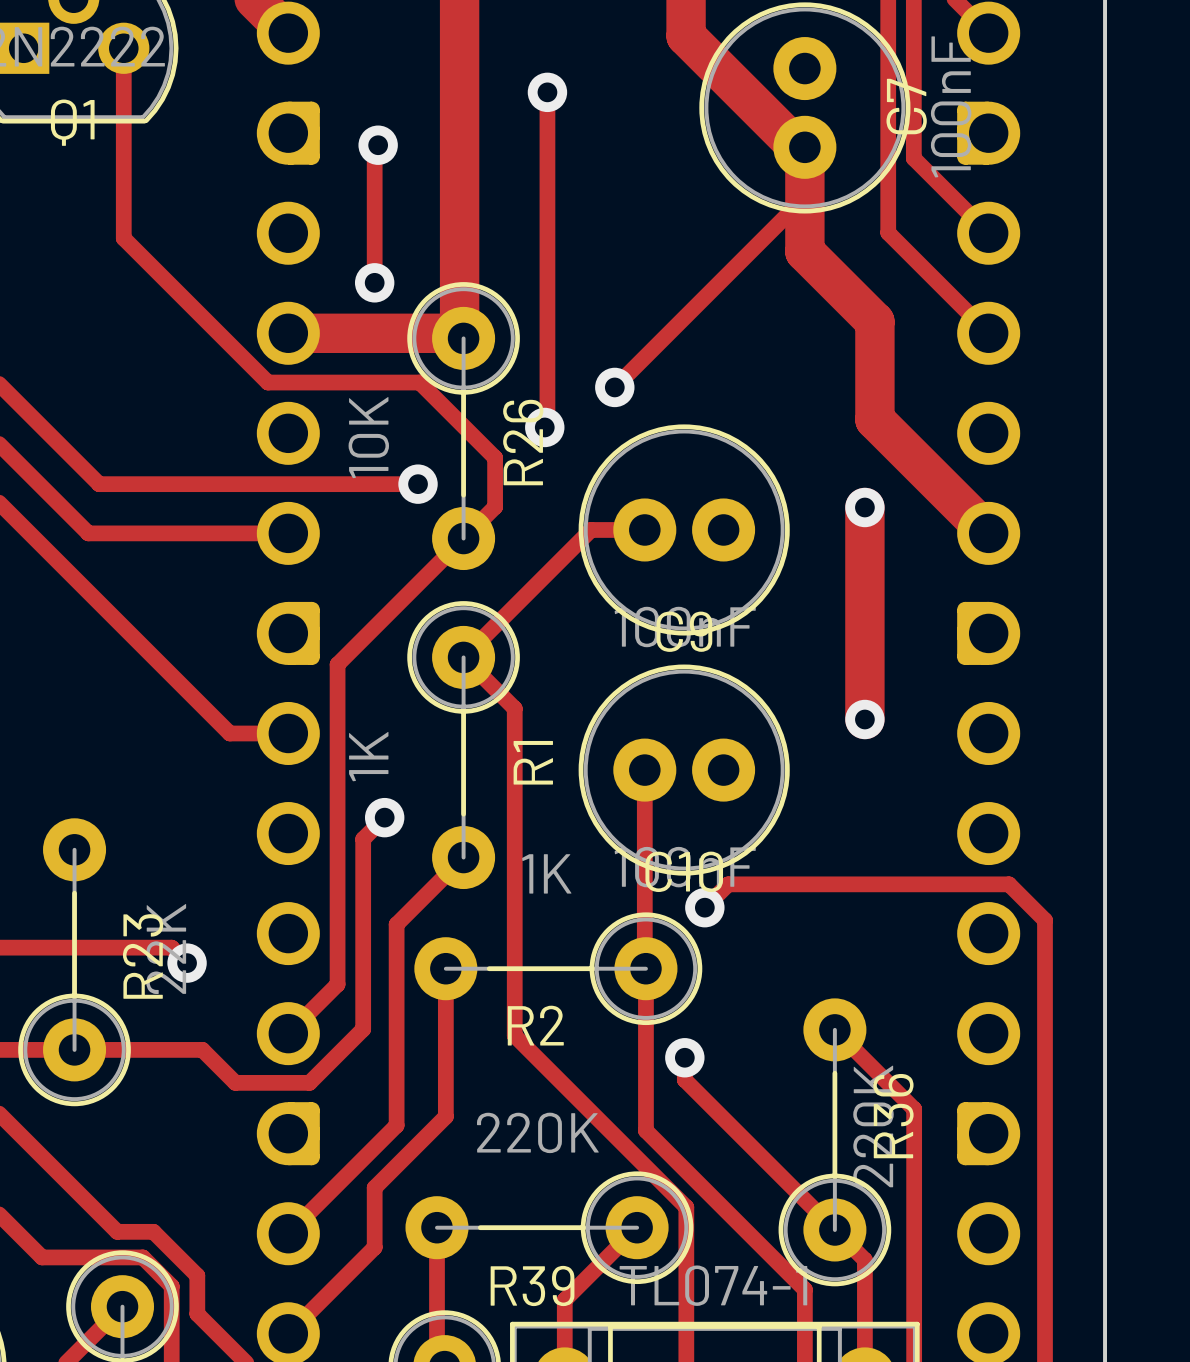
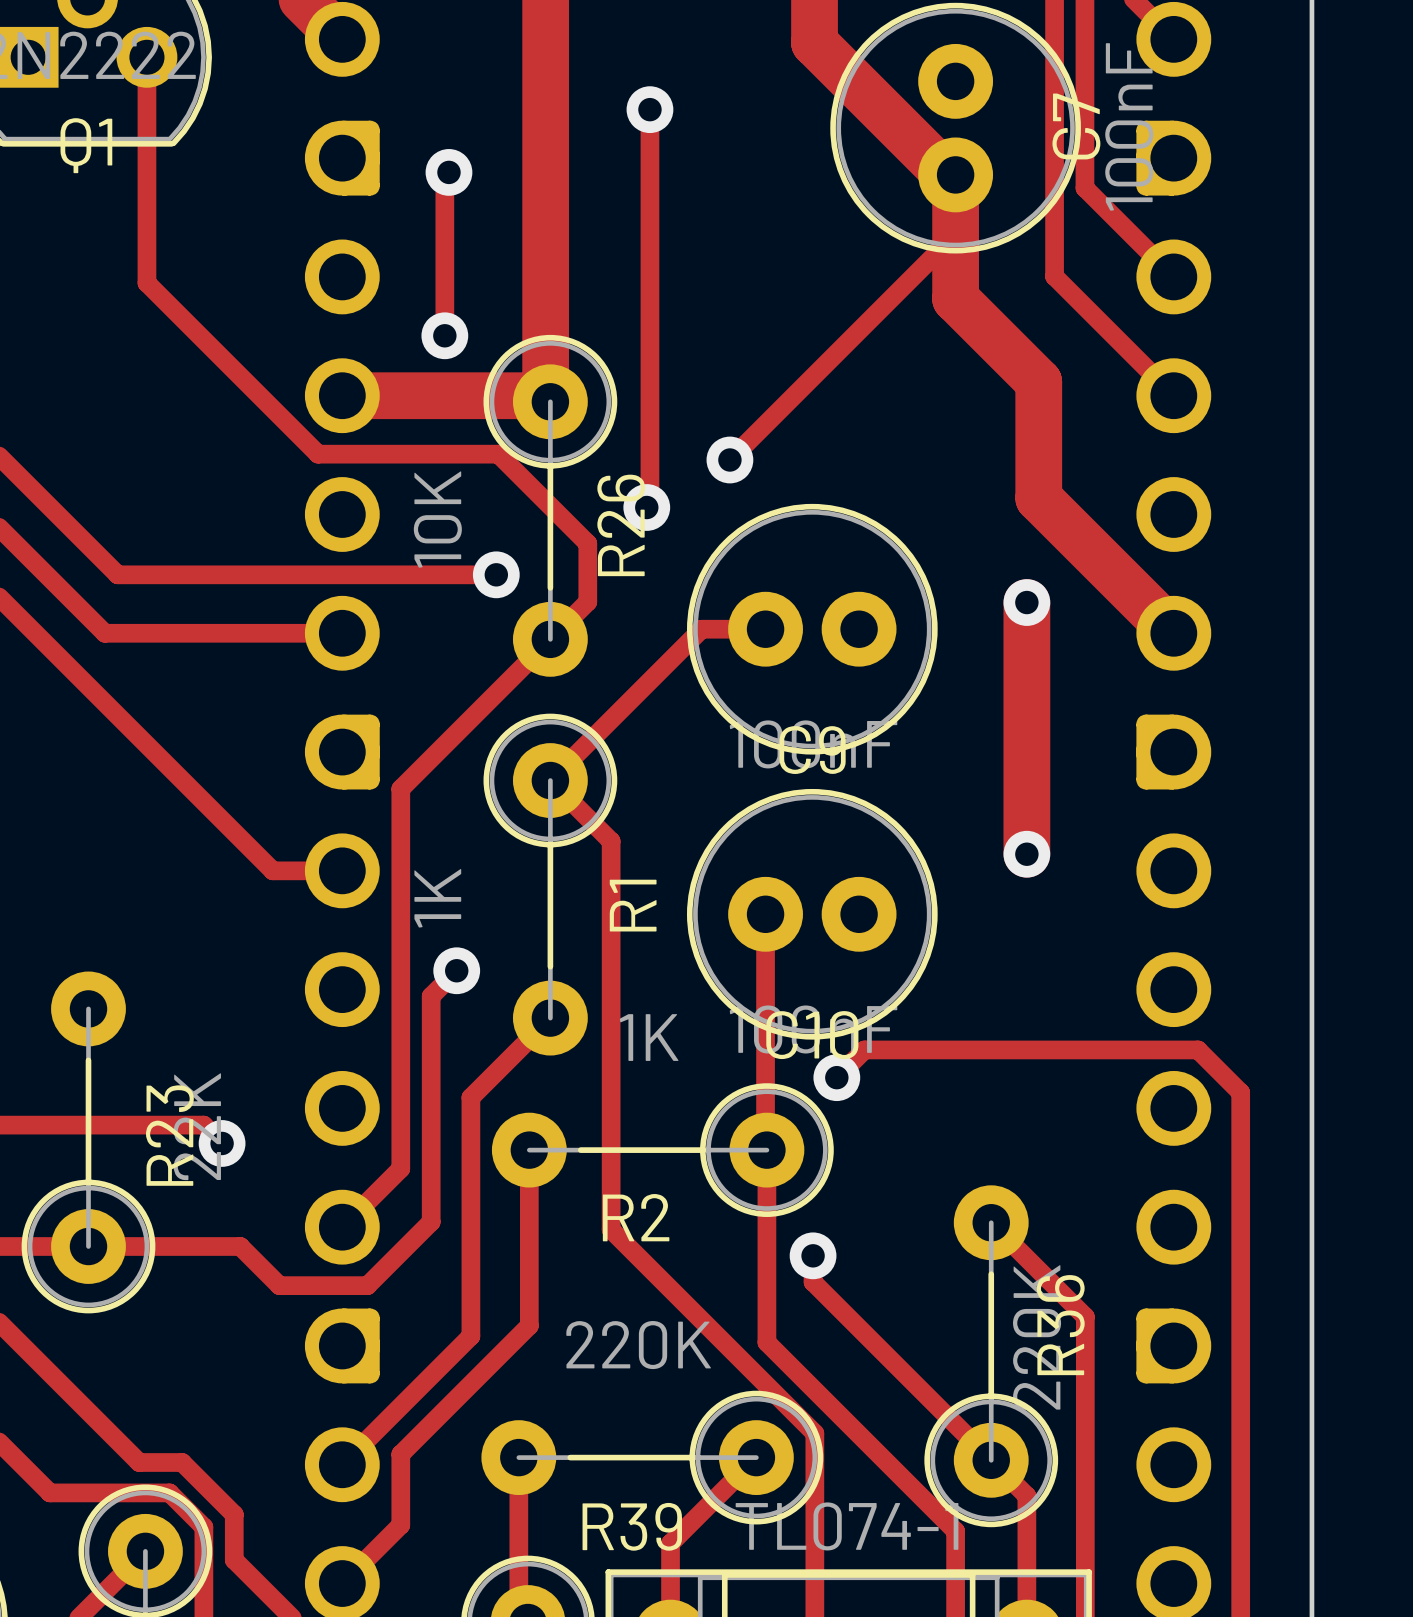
track: (374, 1187) (374, 1247) (337, 1284) -> (444, 1410) (400, 1454) (400, 1525)

